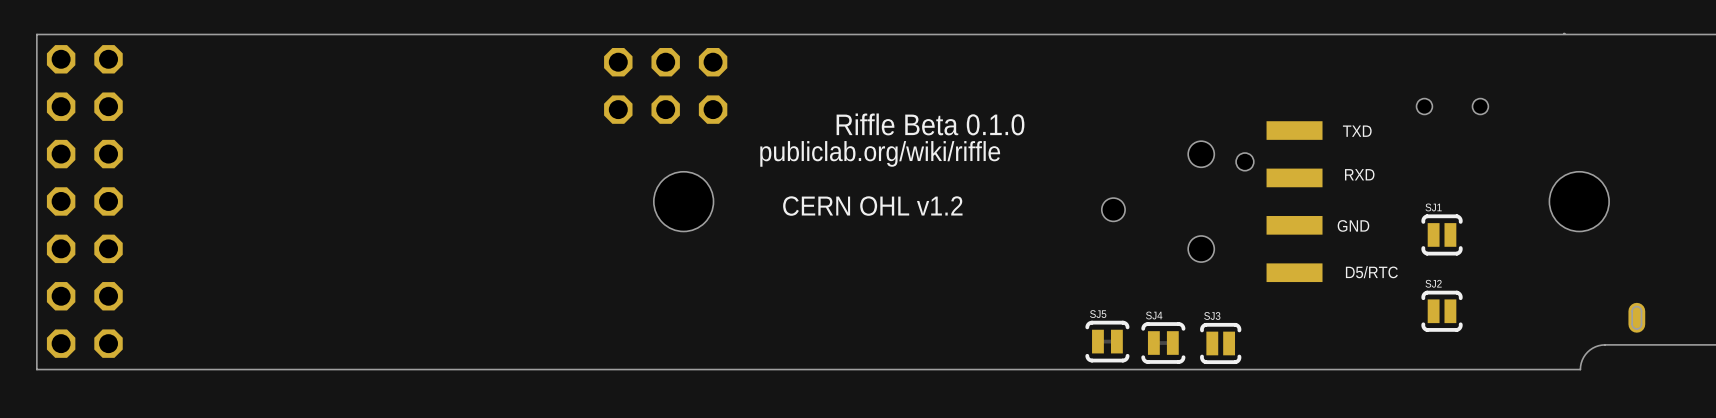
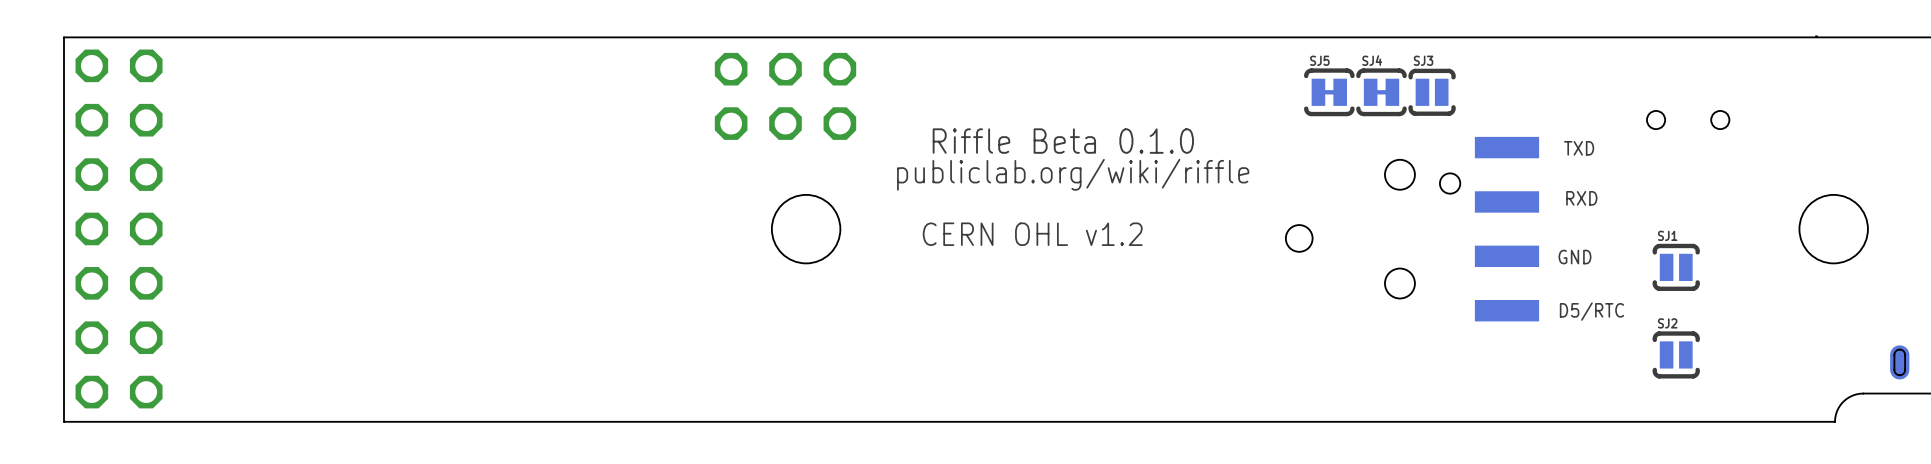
SJ5 position: (1107, 341) -> (1329, 92)
SJ4 position: (1163, 343) -> (1381, 92)
SJ3 position: (1220, 343) -> (1432, 92)

